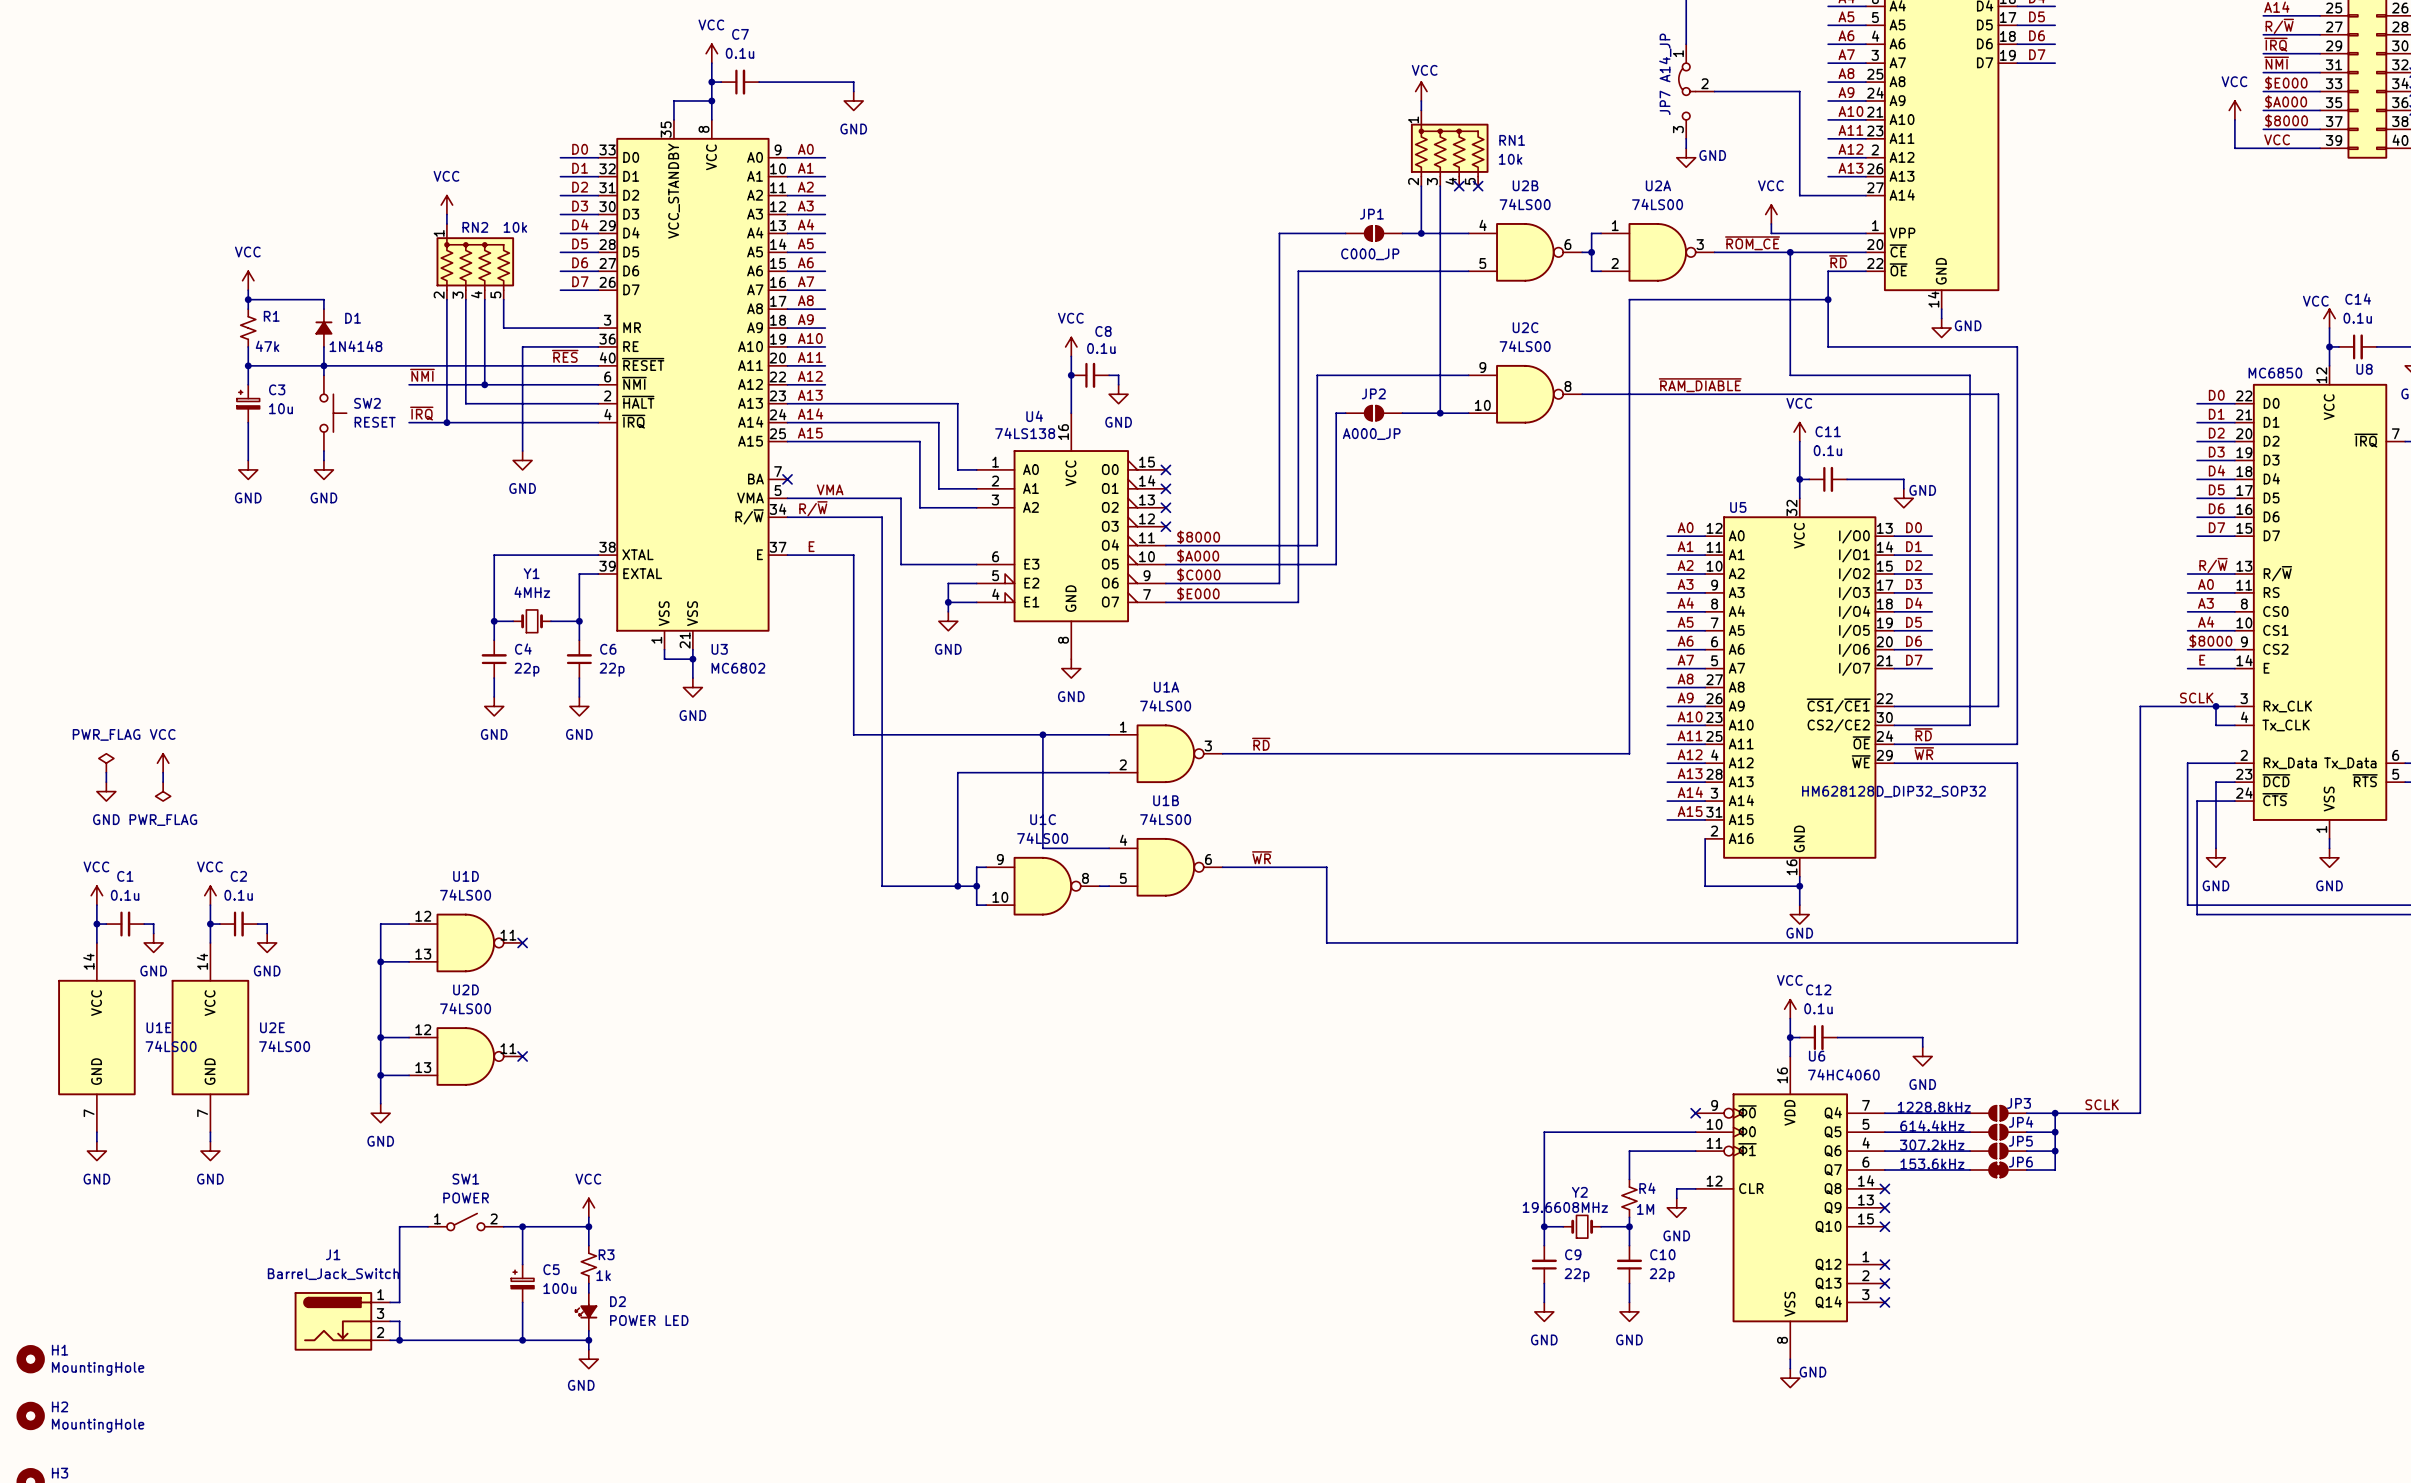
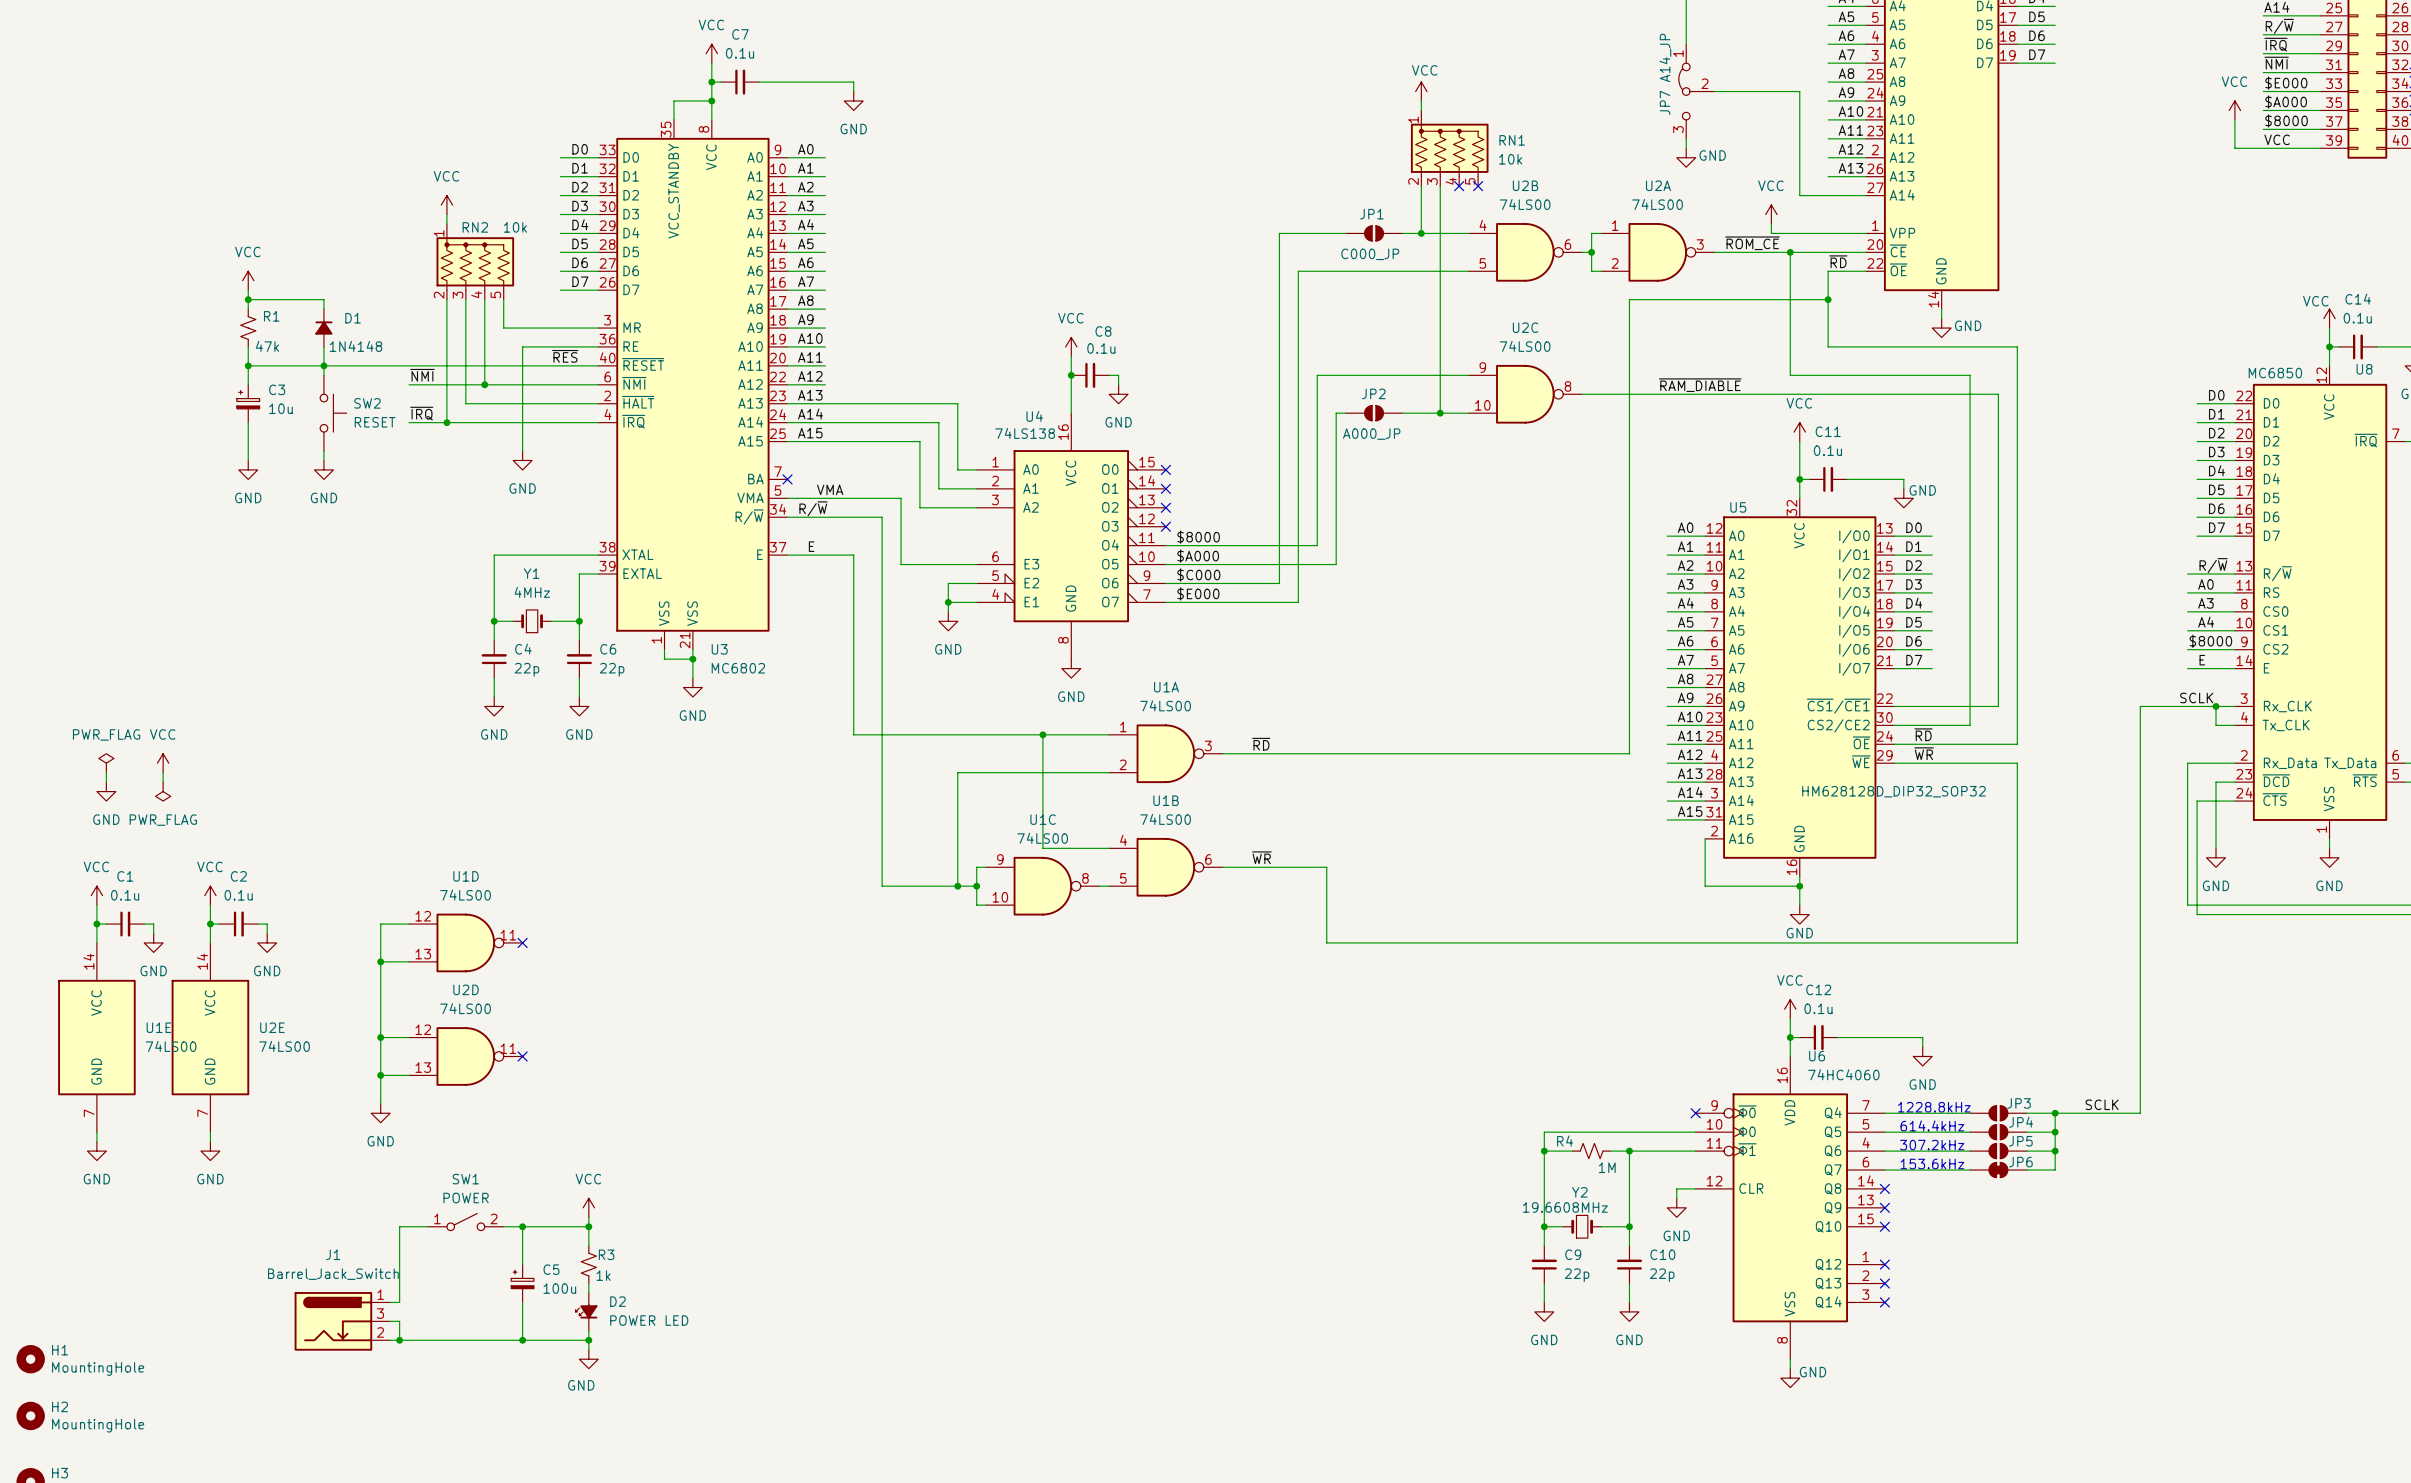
wire: none -> (1544, 1151) (1572, 1151)
junction: none -> (1544, 1151)
wire: none -> (1610, 1151) (1629, 1151)
junction: none -> (1629, 1151)
R4 name position: R4 (1647, 1188) -> R4 (1565, 1141)
R4 rotation: 0° (1629, 1198) -> 90° clockwise (1591, 1151)
R4 position: (1629, 1198) -> (1591, 1151)

